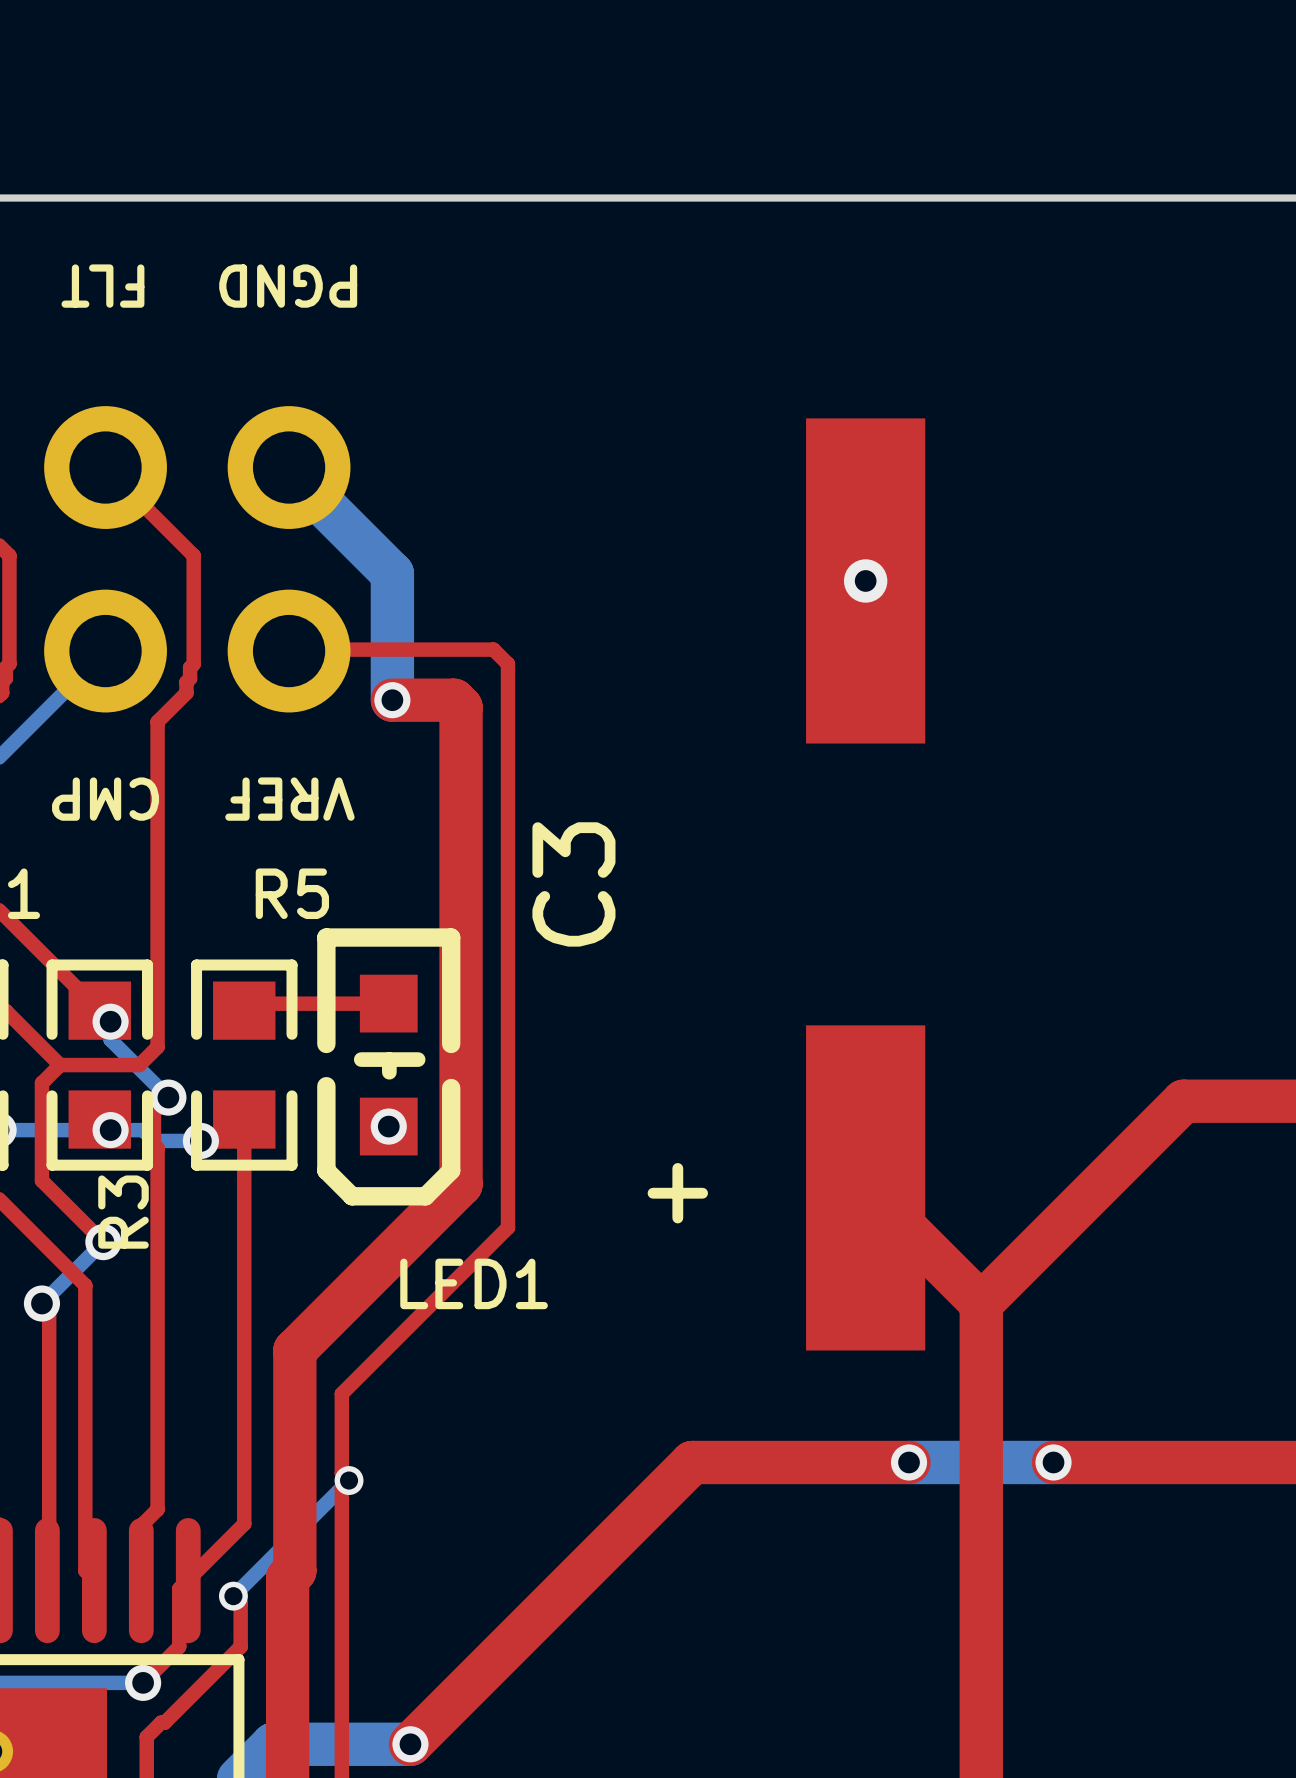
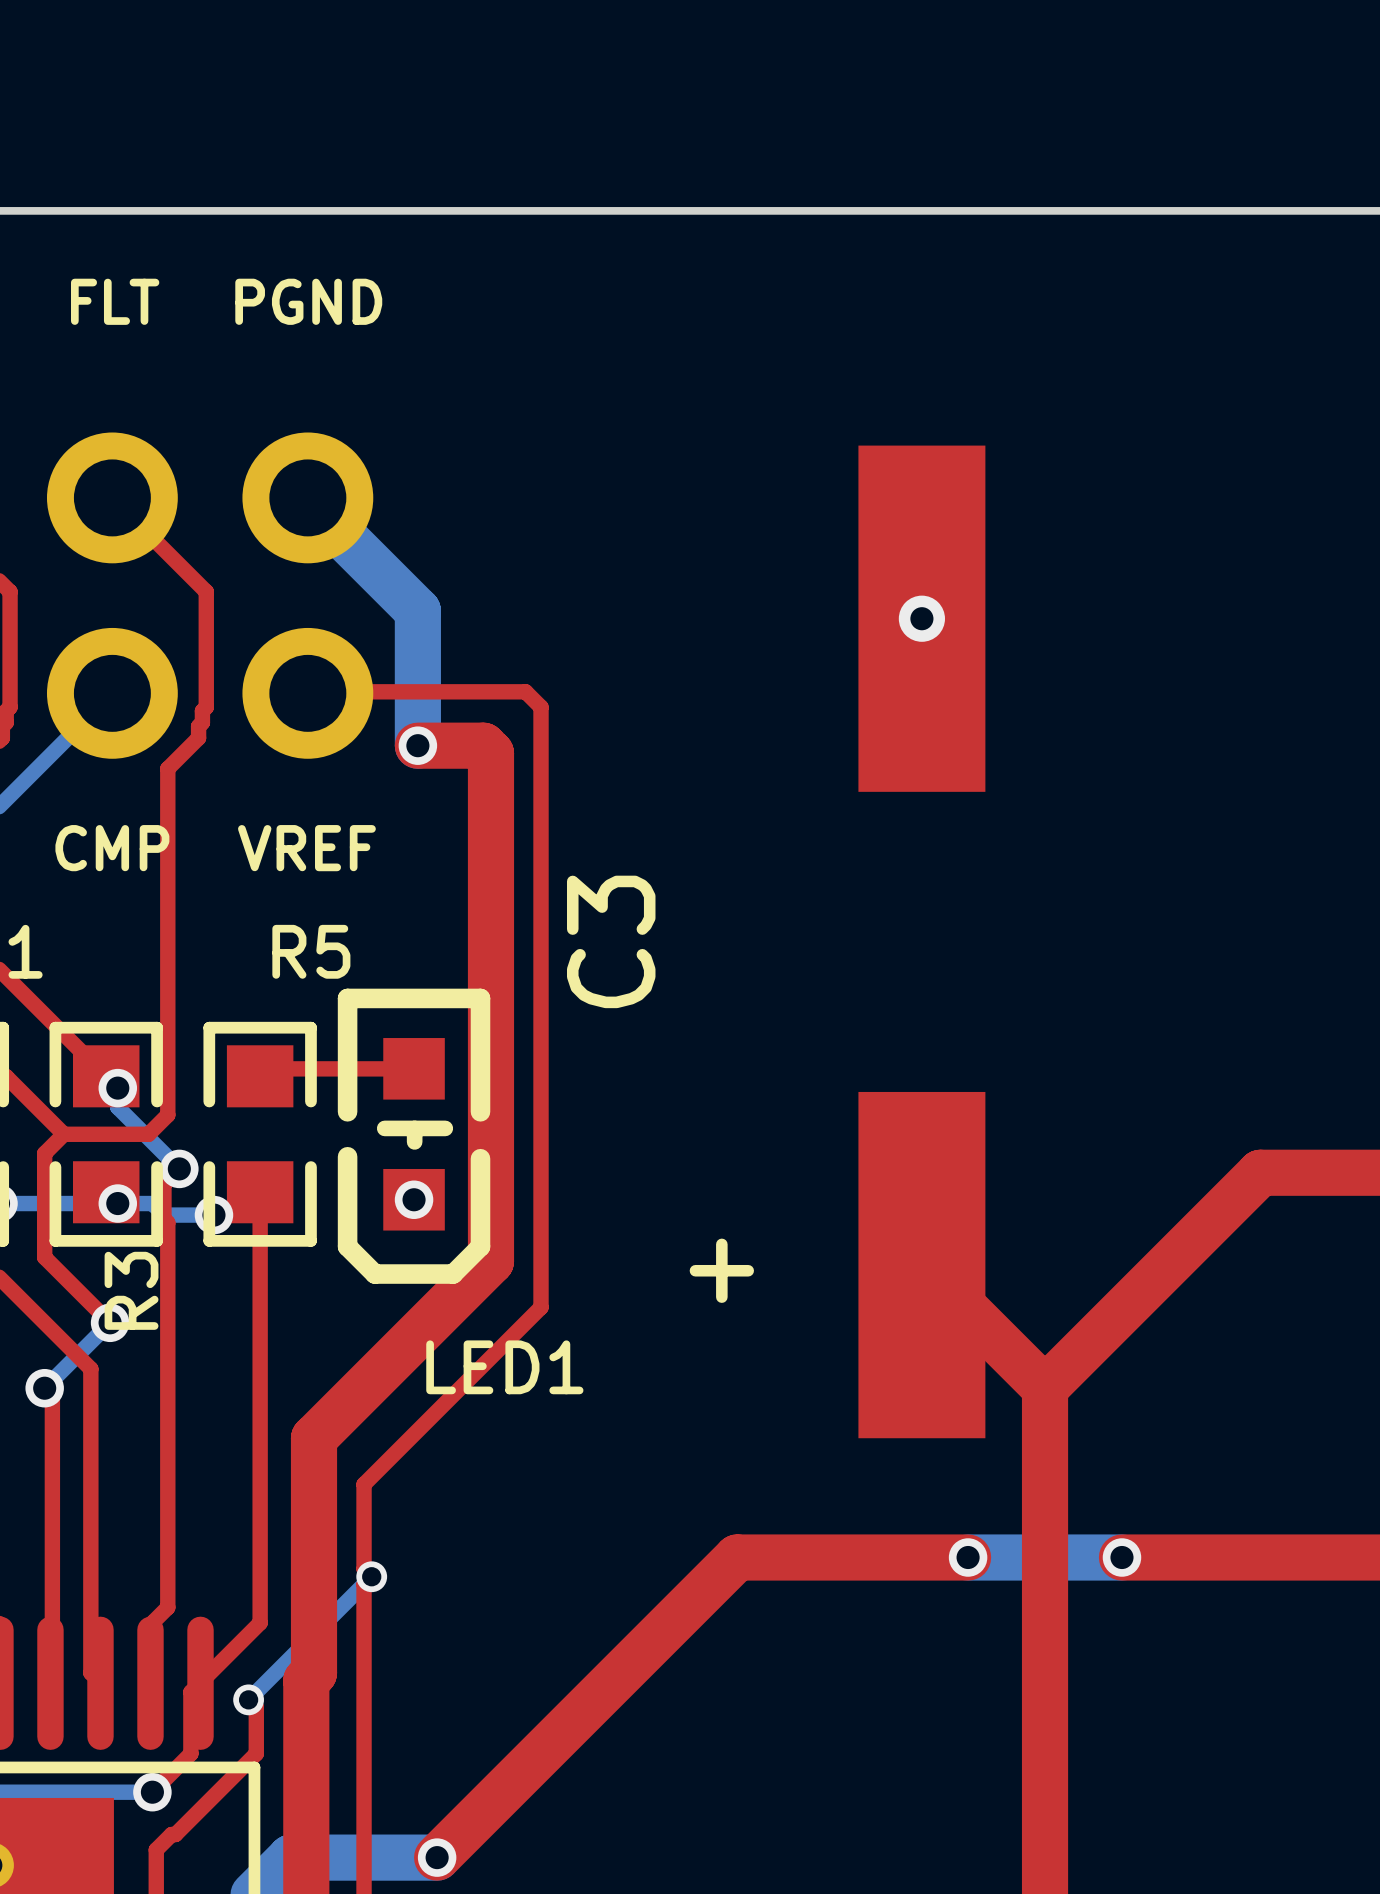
text rotation: 0° (102, 286) -> 180° (115, 301)
text rotation: 0° (288, 286) -> 180° (308, 301)
text rotation: 0° (105, 799) -> 180° (112, 848)
text rotation: 0° (289, 799) -> 180° (306, 848)

